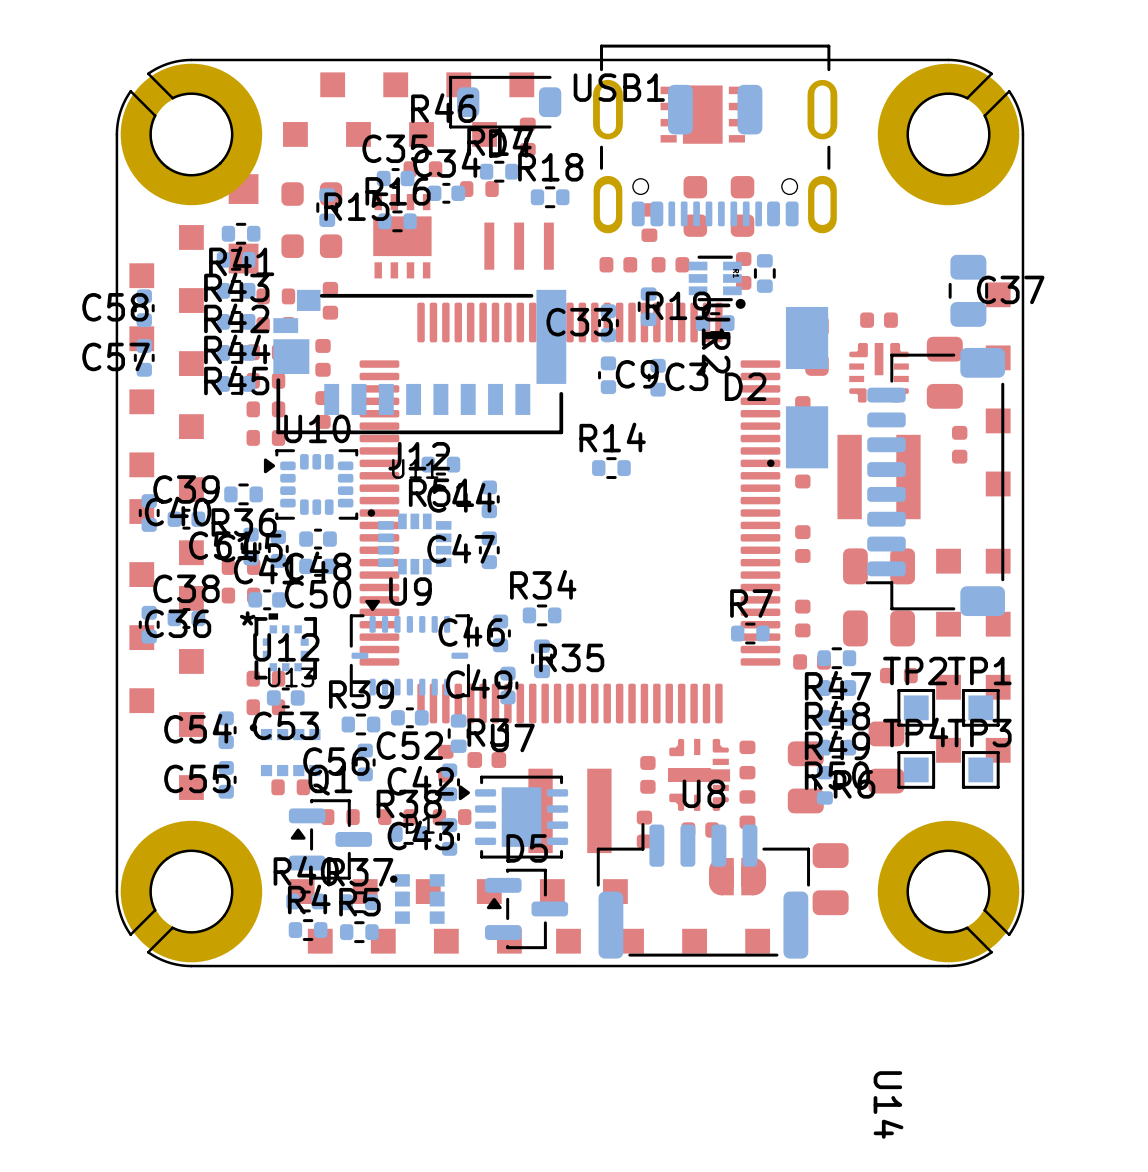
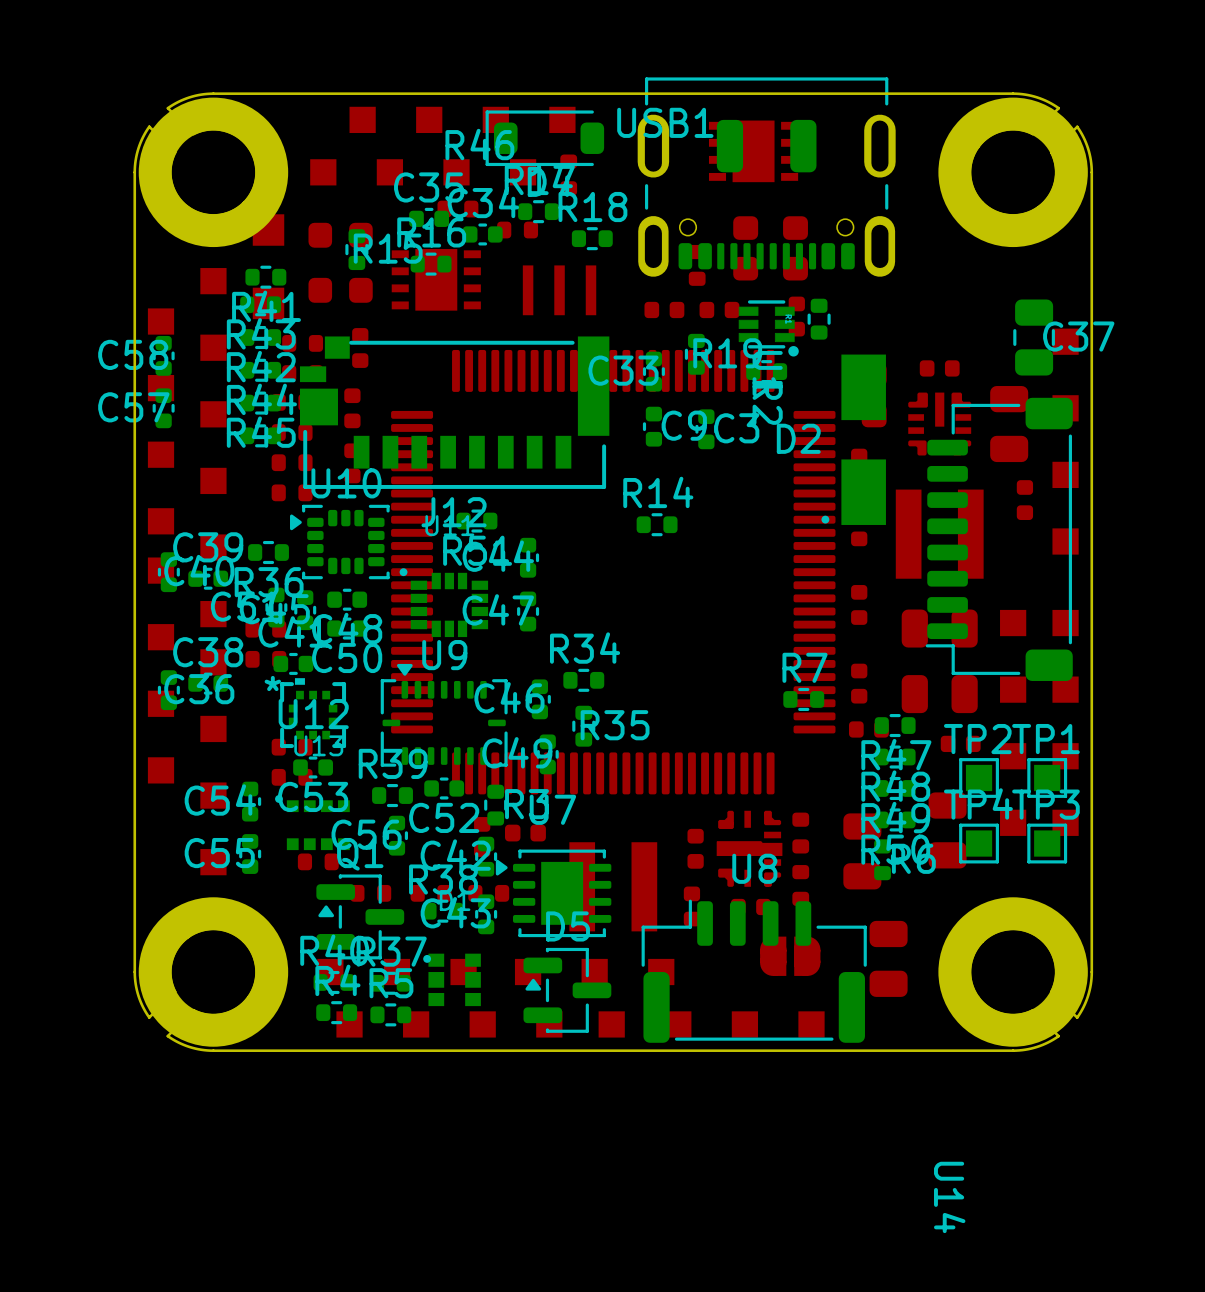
part rotation: 0° (402, 236) -> 90° clockwise (436, 279)

